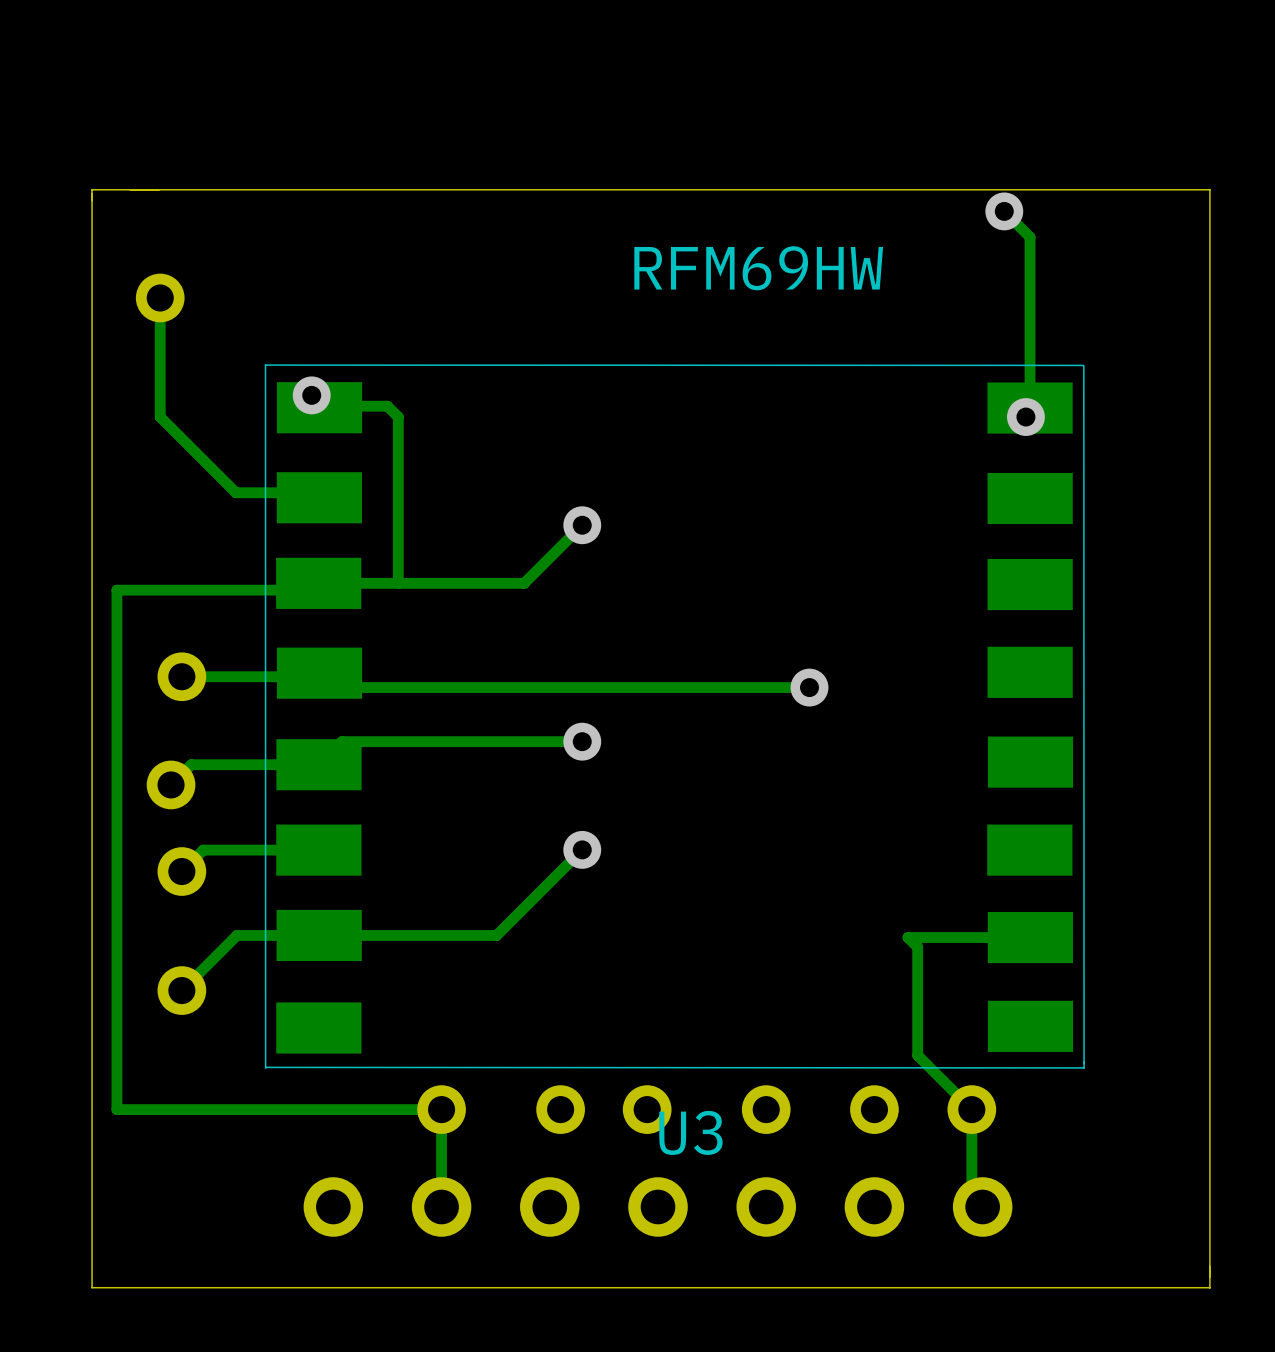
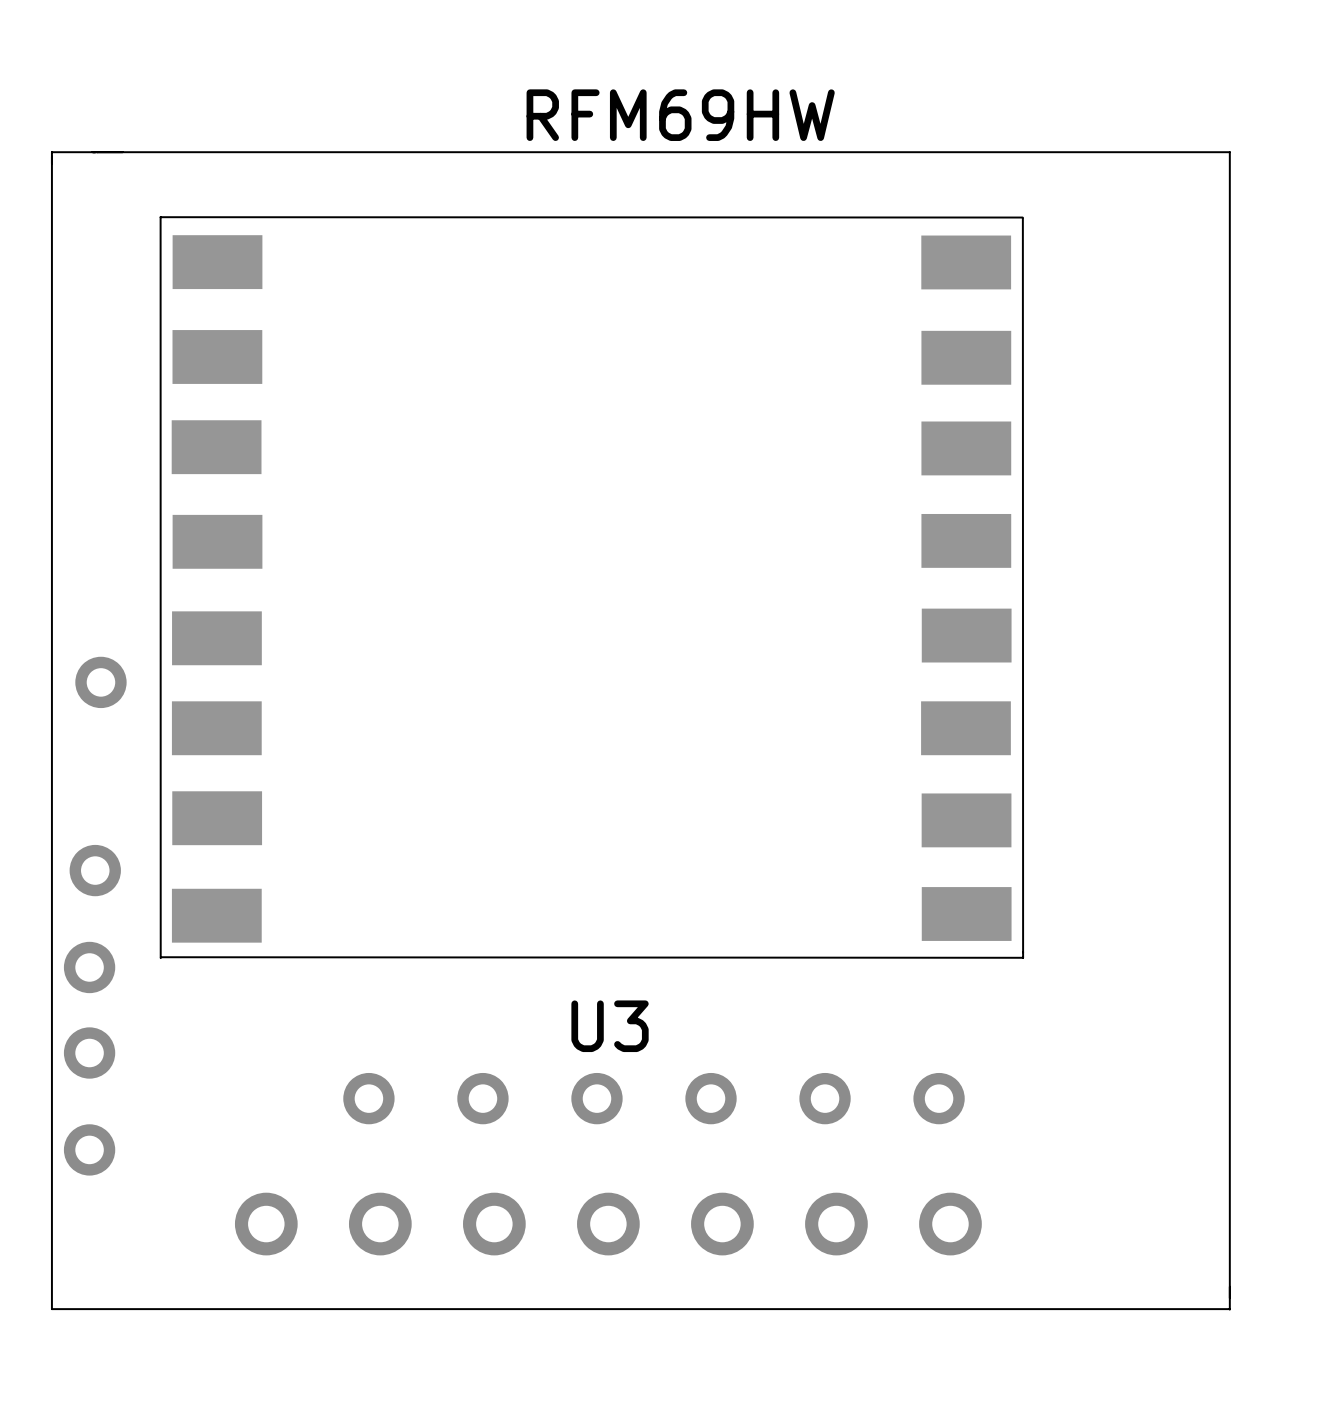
track: (1004, 211) (1030, 237) (1030, 412) (1025, 417) -> none
via: (1004, 211) -> none
track: (160, 297) (160, 417) (235, 492) (314, 492) (319, 497) -> none
part: (160, 297) -> none
track: (311, 395) (319, 403) (319, 407) (387, 406) (398, 417) (398, 583) -> none
via: (311, 395) -> none
via: (1025, 417) -> none
track: (582, 525) (524, 583) (318, 583) (311, 590) (116, 590) (116, 1109) (441, 1109) (441, 1206) -> none
via: (582, 525) -> none
track: (181, 676) (315, 676) (319, 673) (333, 687) (809, 687) -> none
part position: (181, 676) -> (100, 682)
via: (809, 687) -> none
U3 position: (674, 716) -> (591, 587)
track: (582, 741) (342, 741) (318, 764) (191, 764) (171, 784) -> none
via: (582, 741) -> none
part: (171, 784) -> none
track: (582, 849) (496, 935) (236, 935) (181, 990) -> none
via: (582, 849) -> none
track: (318, 850) (203, 850) (181, 871) -> none
part: none -> (95, 870)
part: (181, 871) -> none
track: (1030, 937) (907, 937) (917, 947) (917, 1055) (971, 1109) (971, 1196) (982, 1206) -> none
part: none -> (89, 967)
part: (181, 990) -> none
part: none -> (89, 1053)
part: none -> (368, 1098)
part: none -> (482, 1098)
part: none -> (596, 1098)
part: none -> (711, 1098)
part: none -> (825, 1098)
part: none -> (939, 1098)
part: (441, 1109) -> none
part: (560, 1109) -> none
part: (647, 1109) -> none
part: (766, 1109) -> none
part: (874, 1109) -> none
part: (971, 1109) -> none
part: none -> (89, 1149)
part position: (658, 1206) -> (608, 1224)

